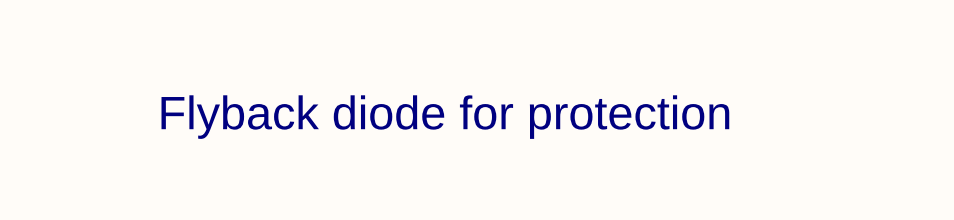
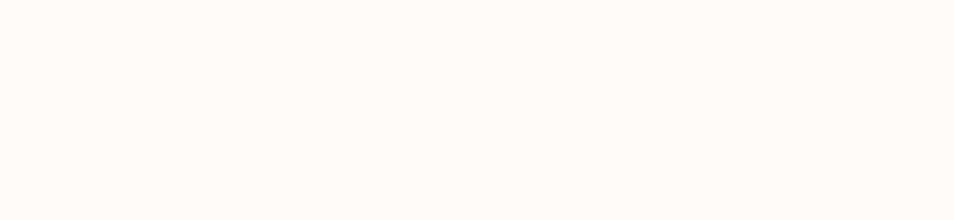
text: Flyback diode for protection (445, 117) -> none

